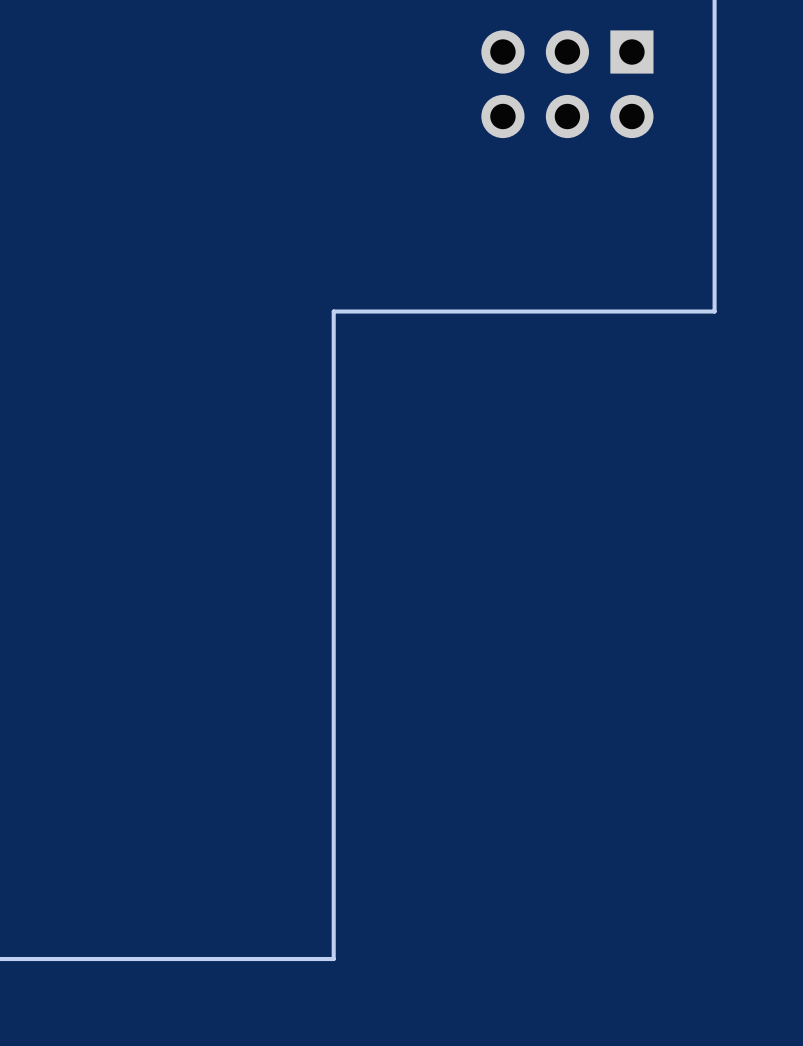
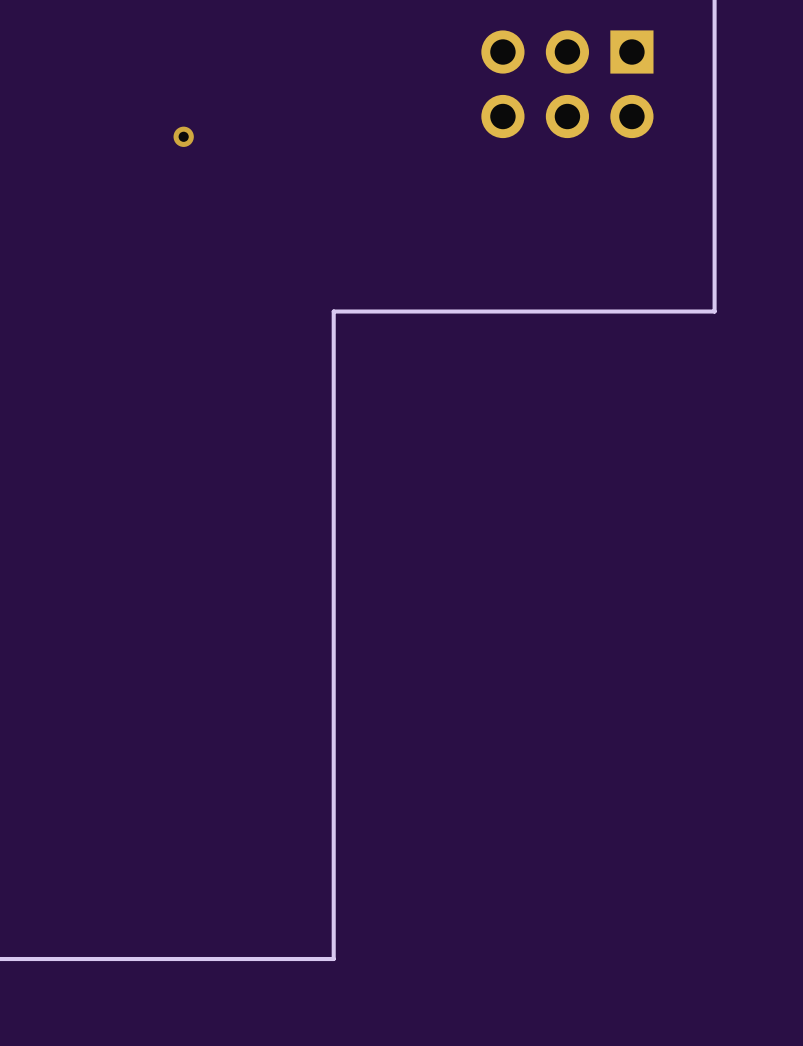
via: none -> (183, 136)

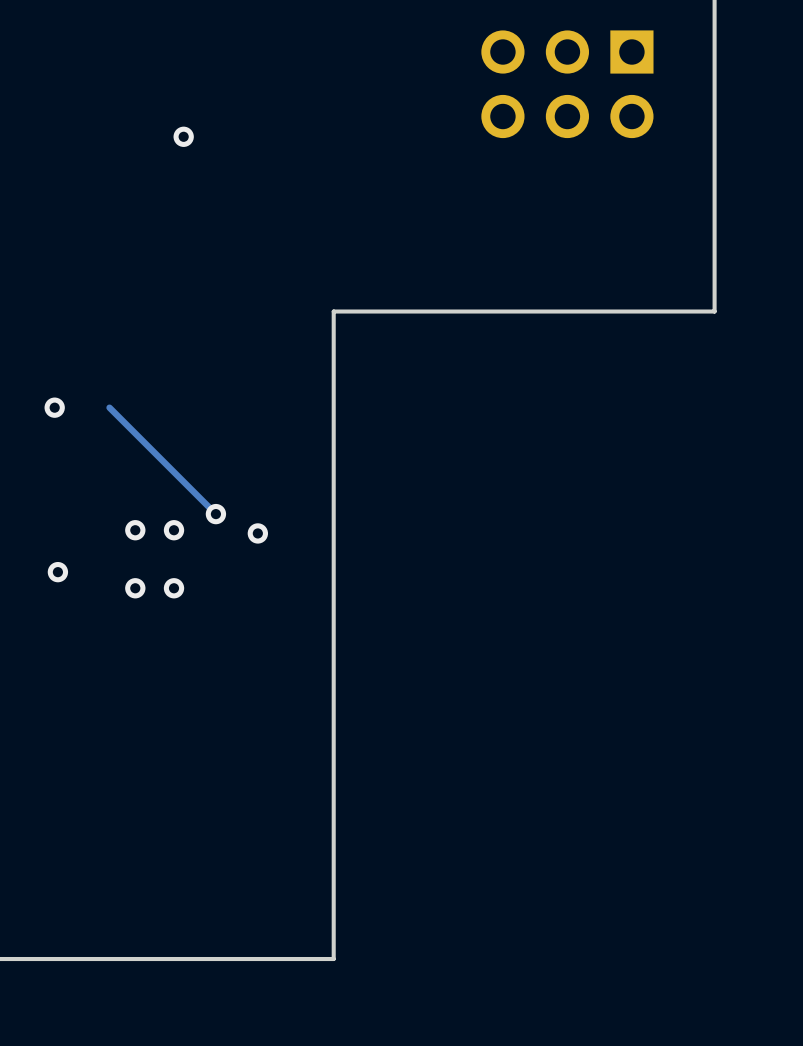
via: none -> (54, 407)
track: none -> (109, 407) (215, 514)
via: none -> (215, 514)
via: none -> (135, 530)
via: none -> (174, 530)
via: none -> (257, 533)
via: none -> (57, 572)
via: none -> (135, 588)
via: none -> (174, 588)

